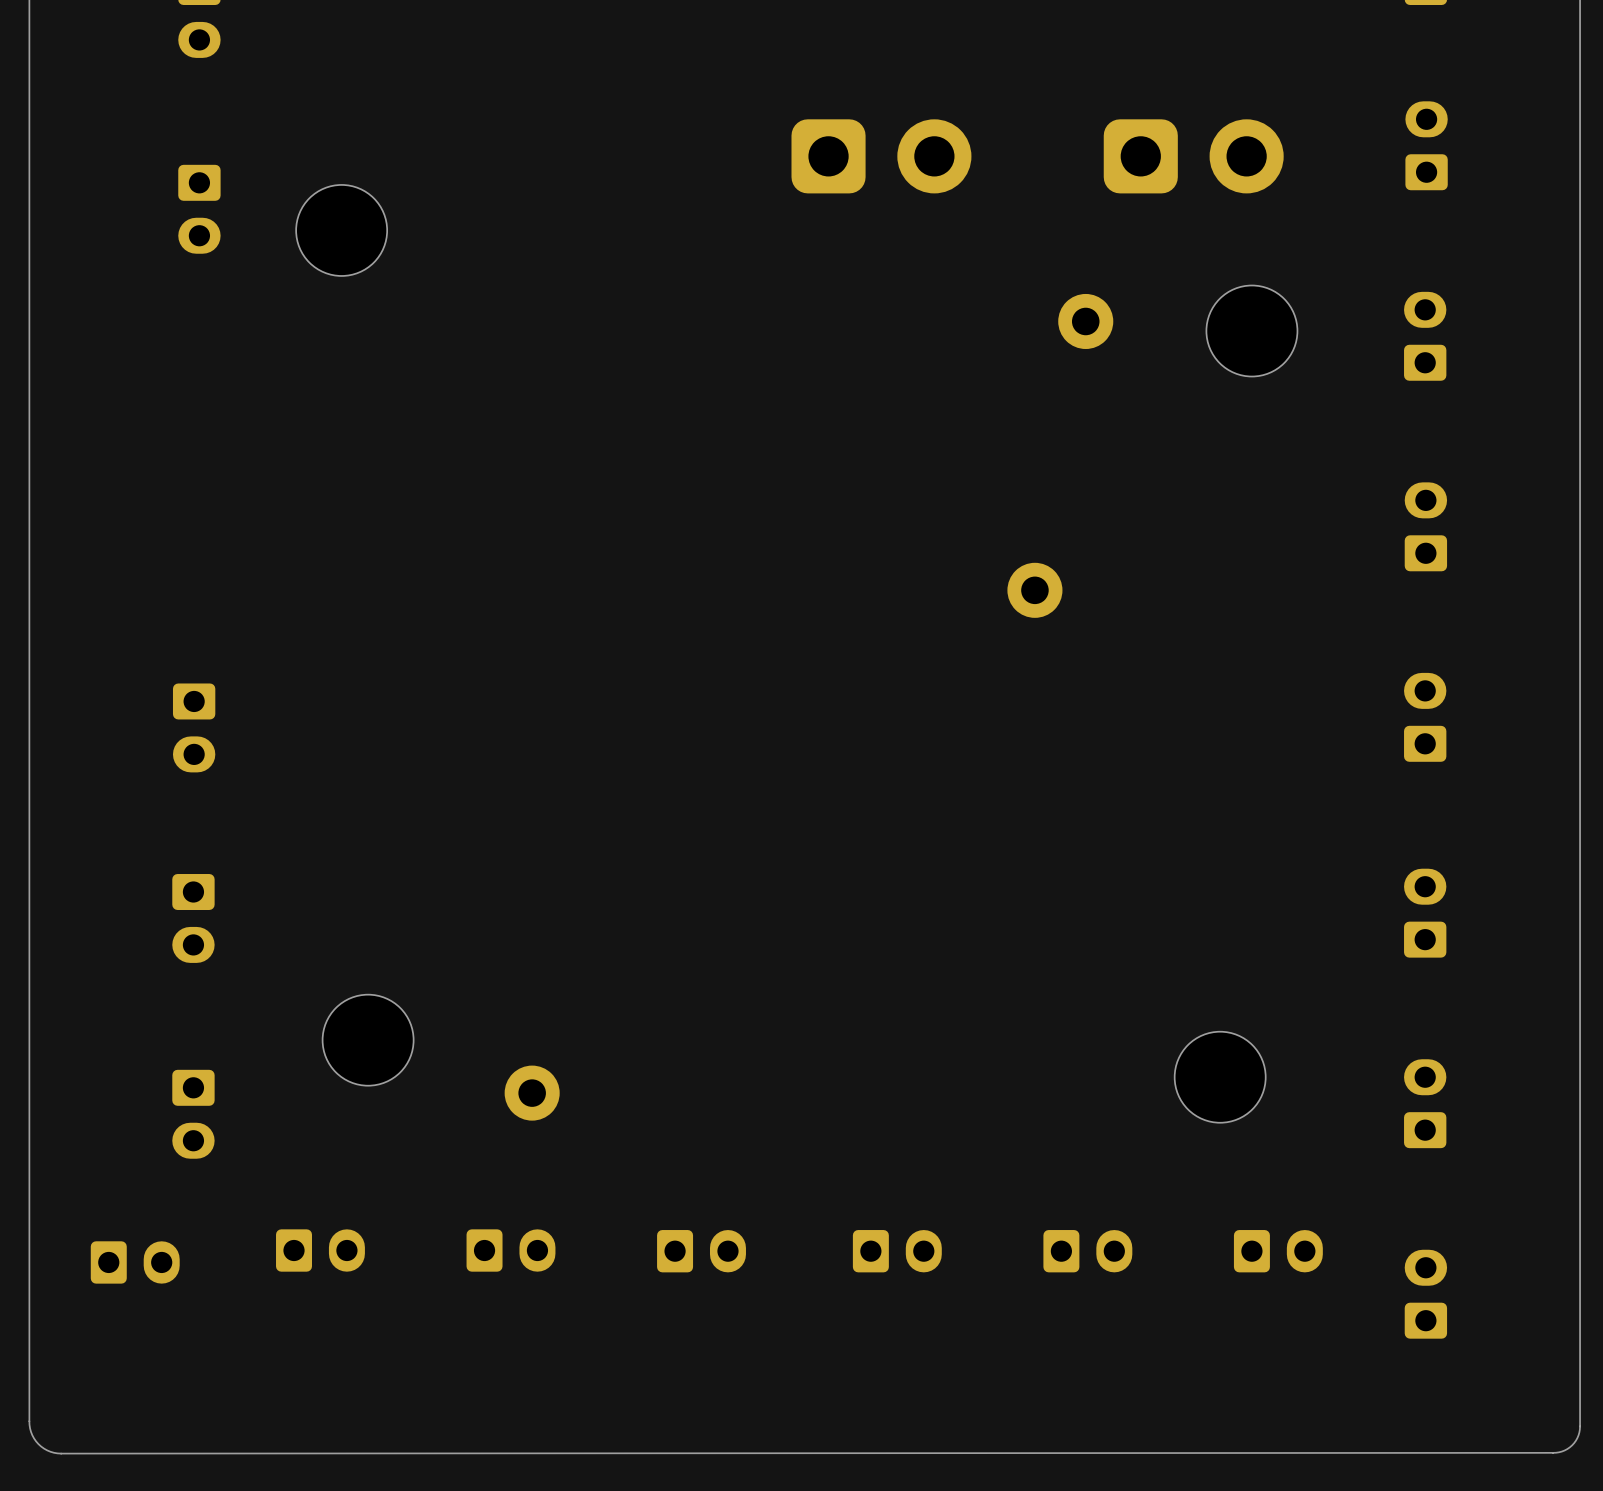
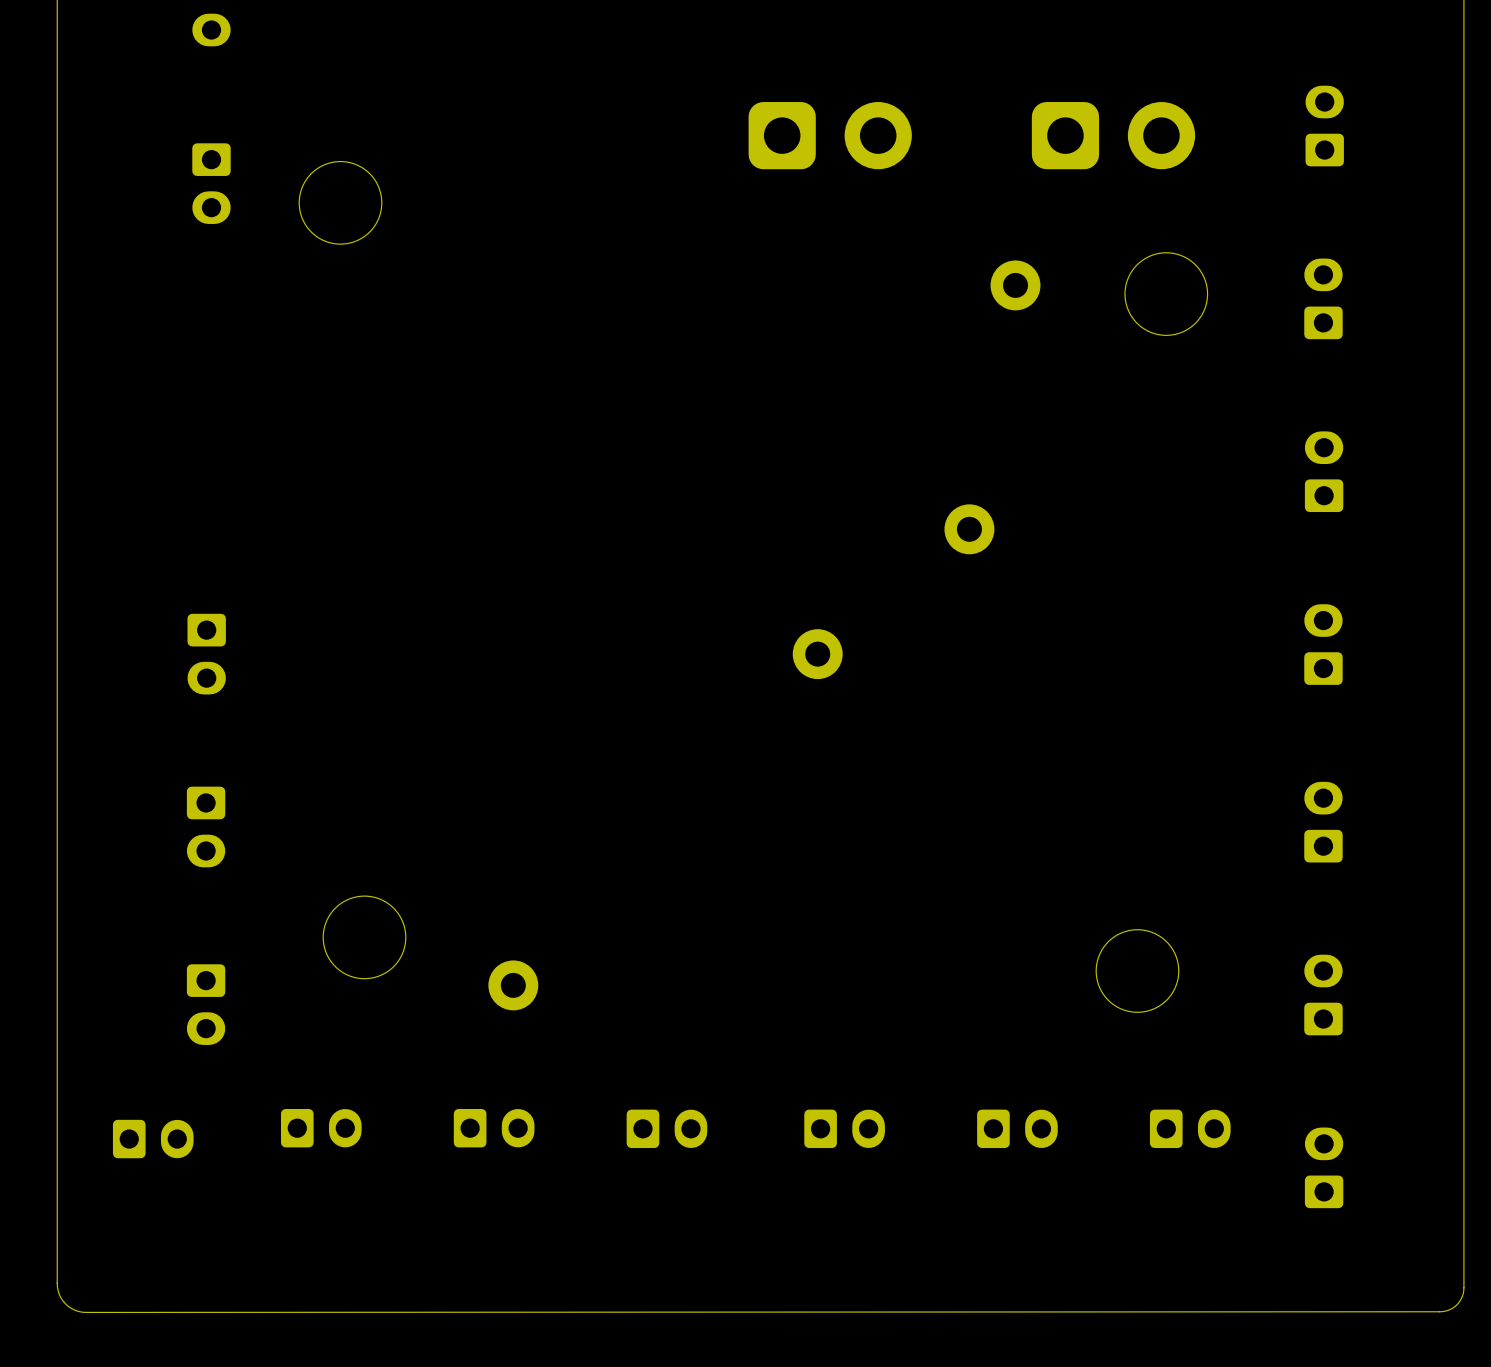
part: none -> (817, 654)

